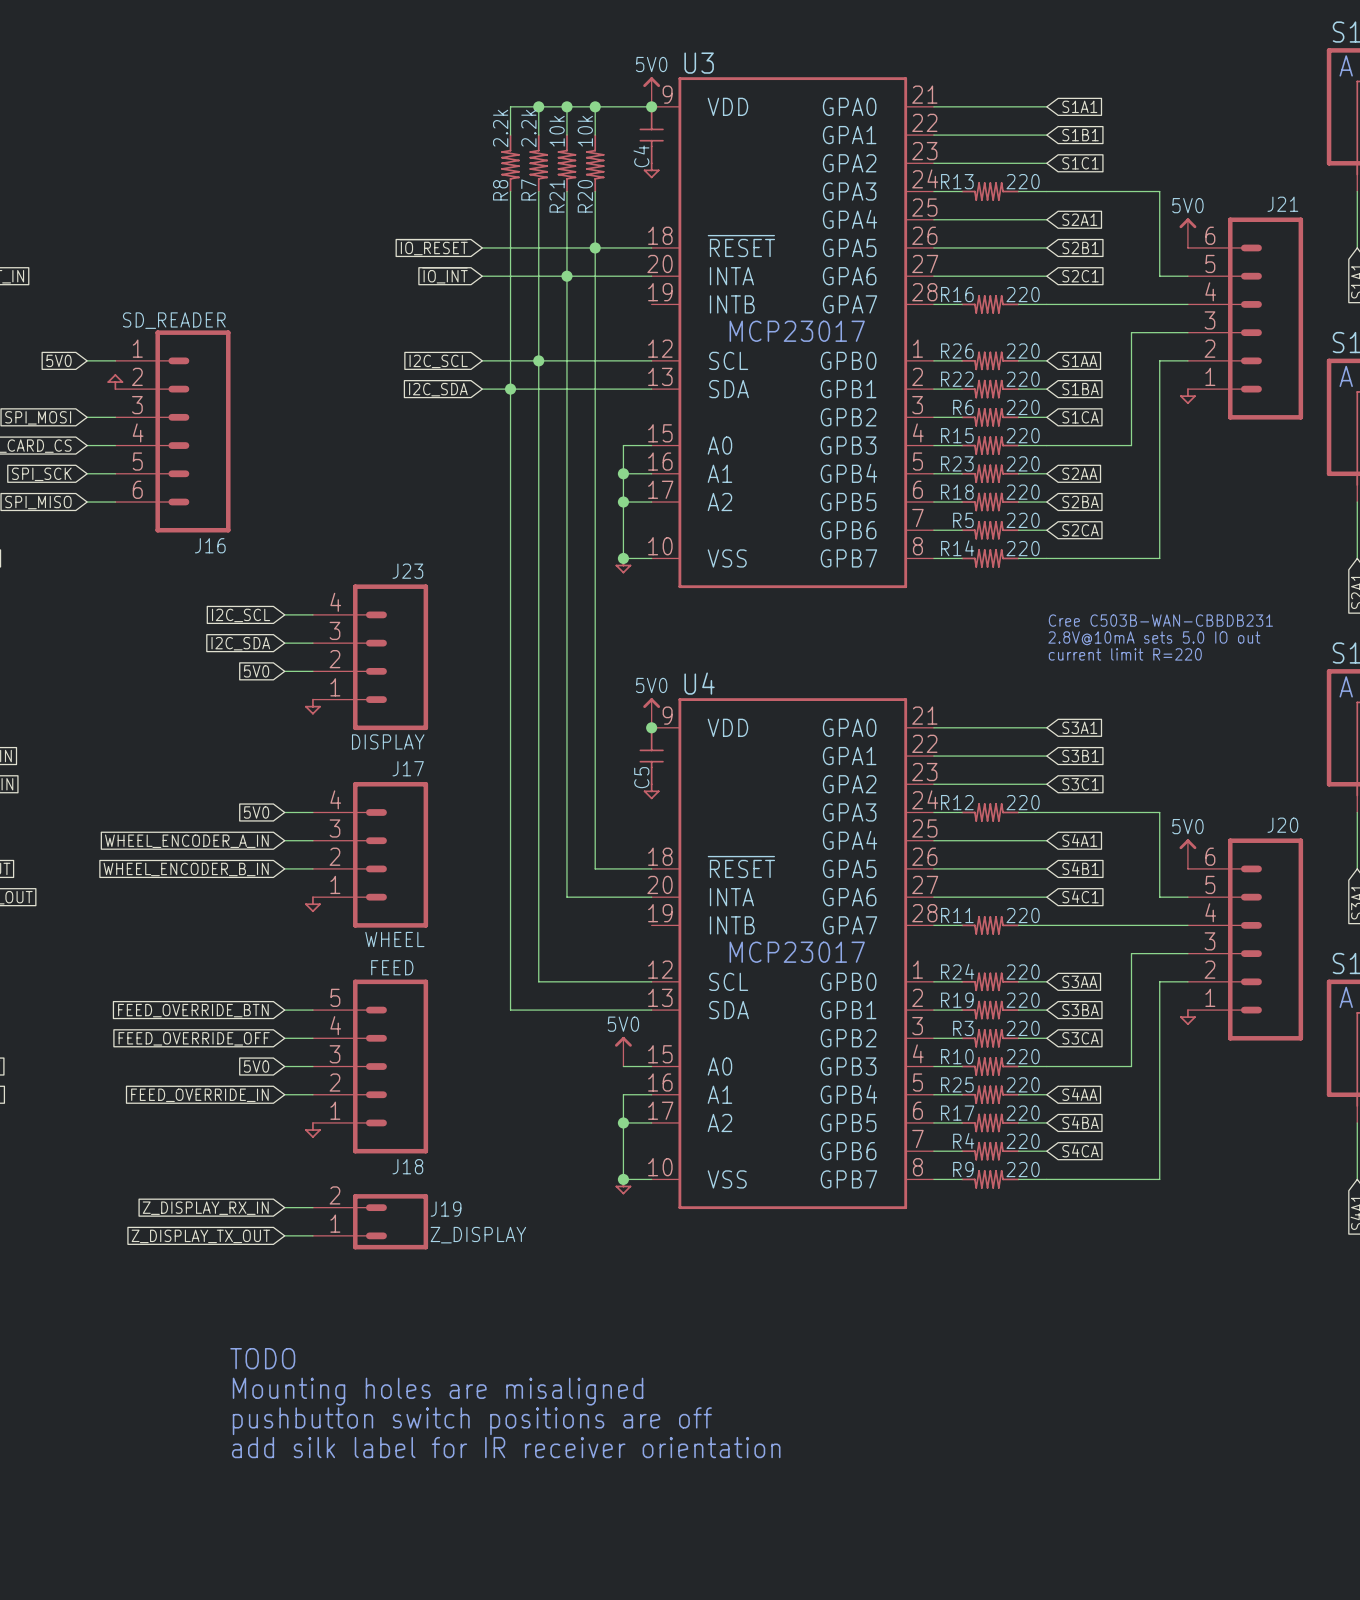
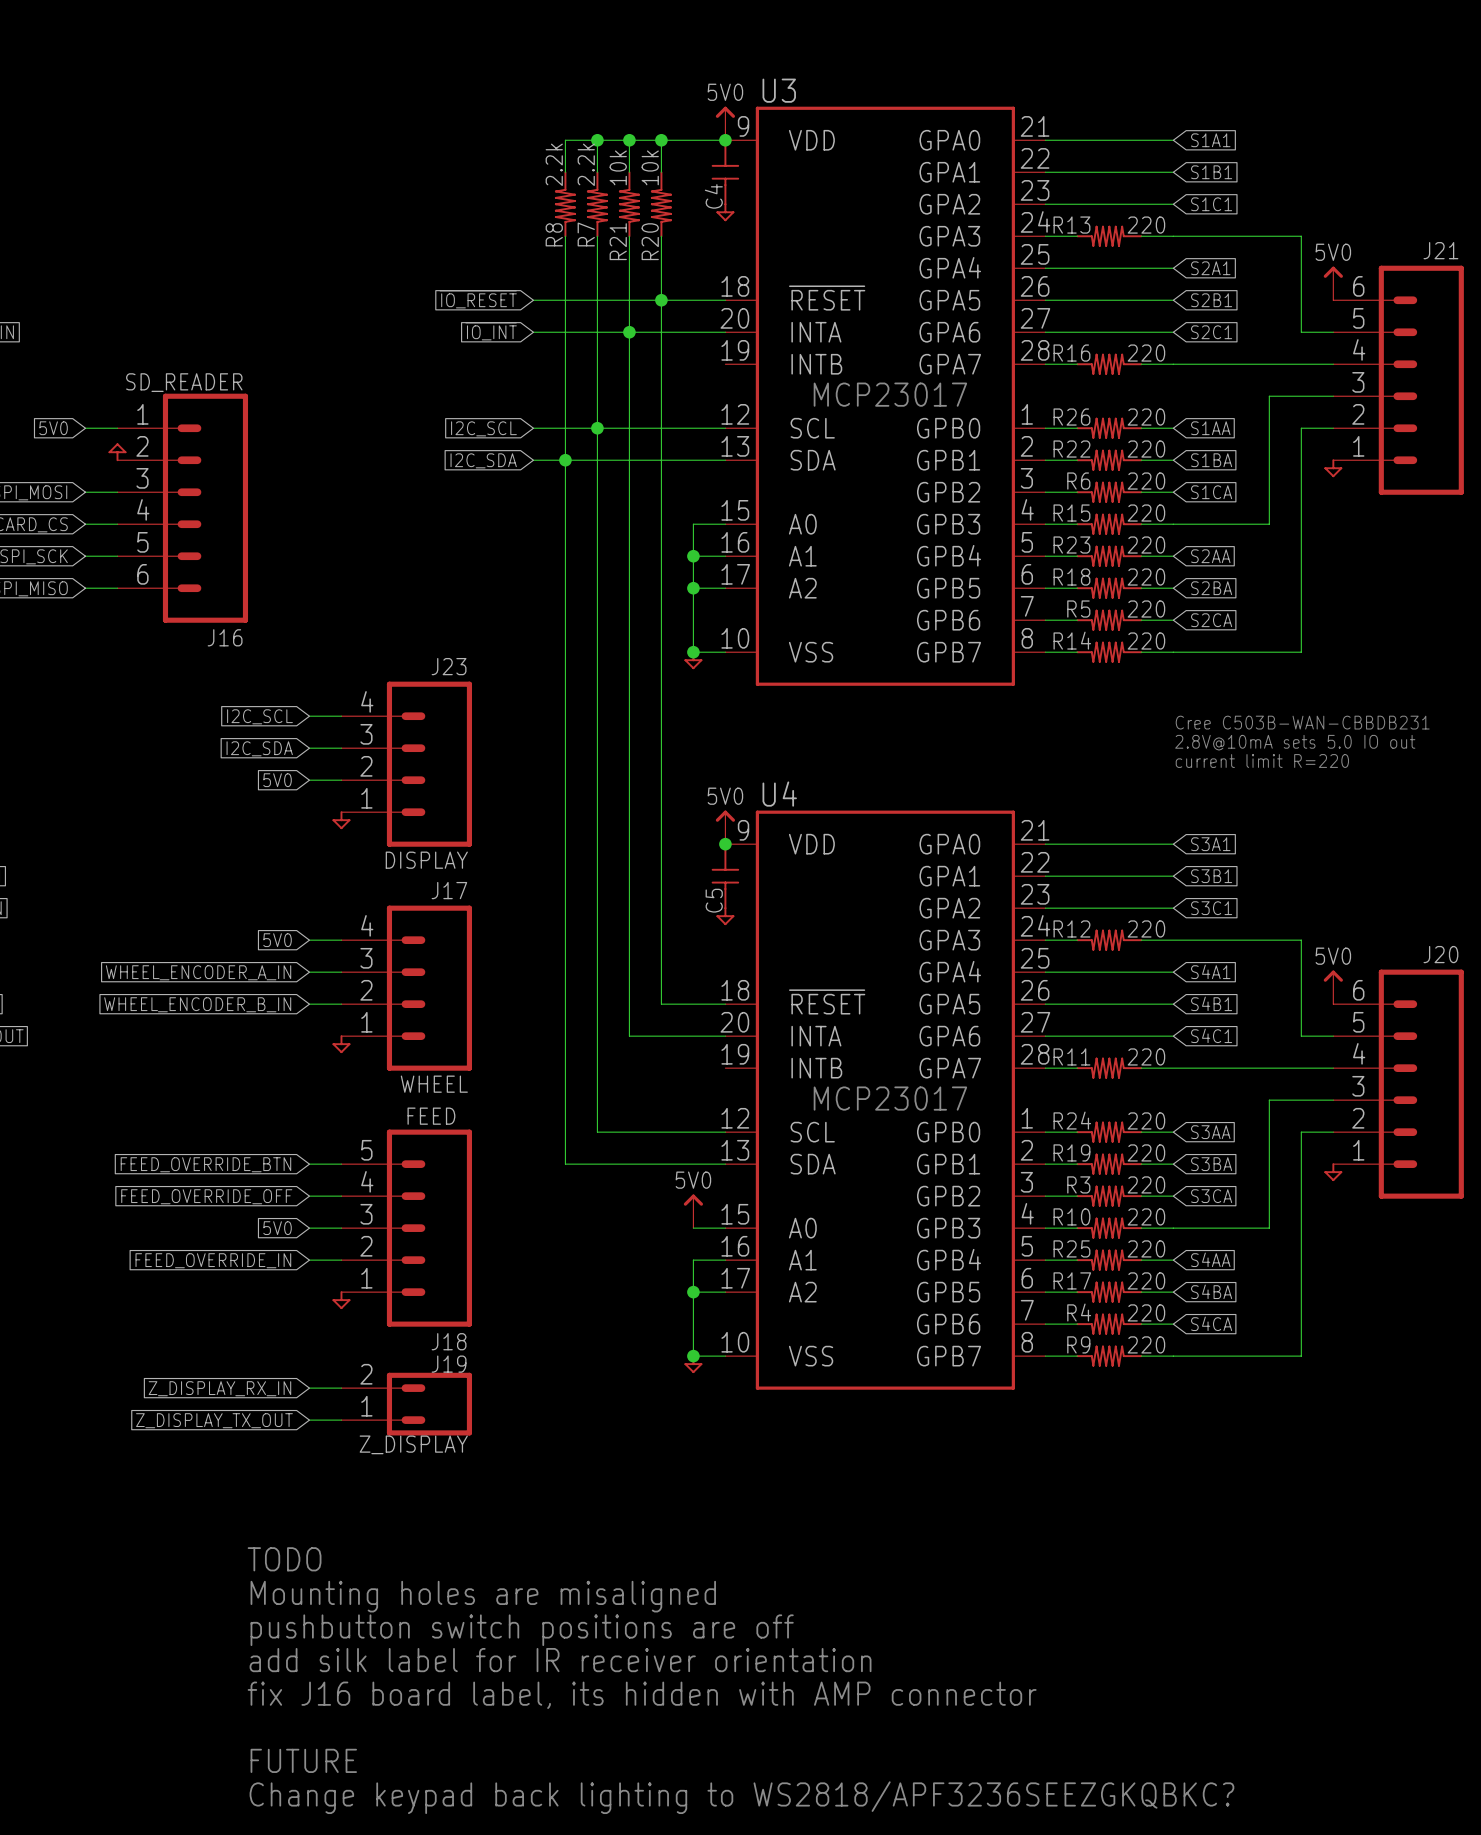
J19 name position: J19 (446, 1209) -> J19 (449, 1364)
J19 value position: Z_DISPLAY (478, 1235) -> Z_DISPLAY (413, 1444)
text: none -> fix J16 board label, its hidden with AMP connector (642, 1695)
text: none -> FUTURE (303, 1760)
text: none -> Change keypad back lighting to WS2818/APF3236SEEZGKQBKC? (741, 1797)

